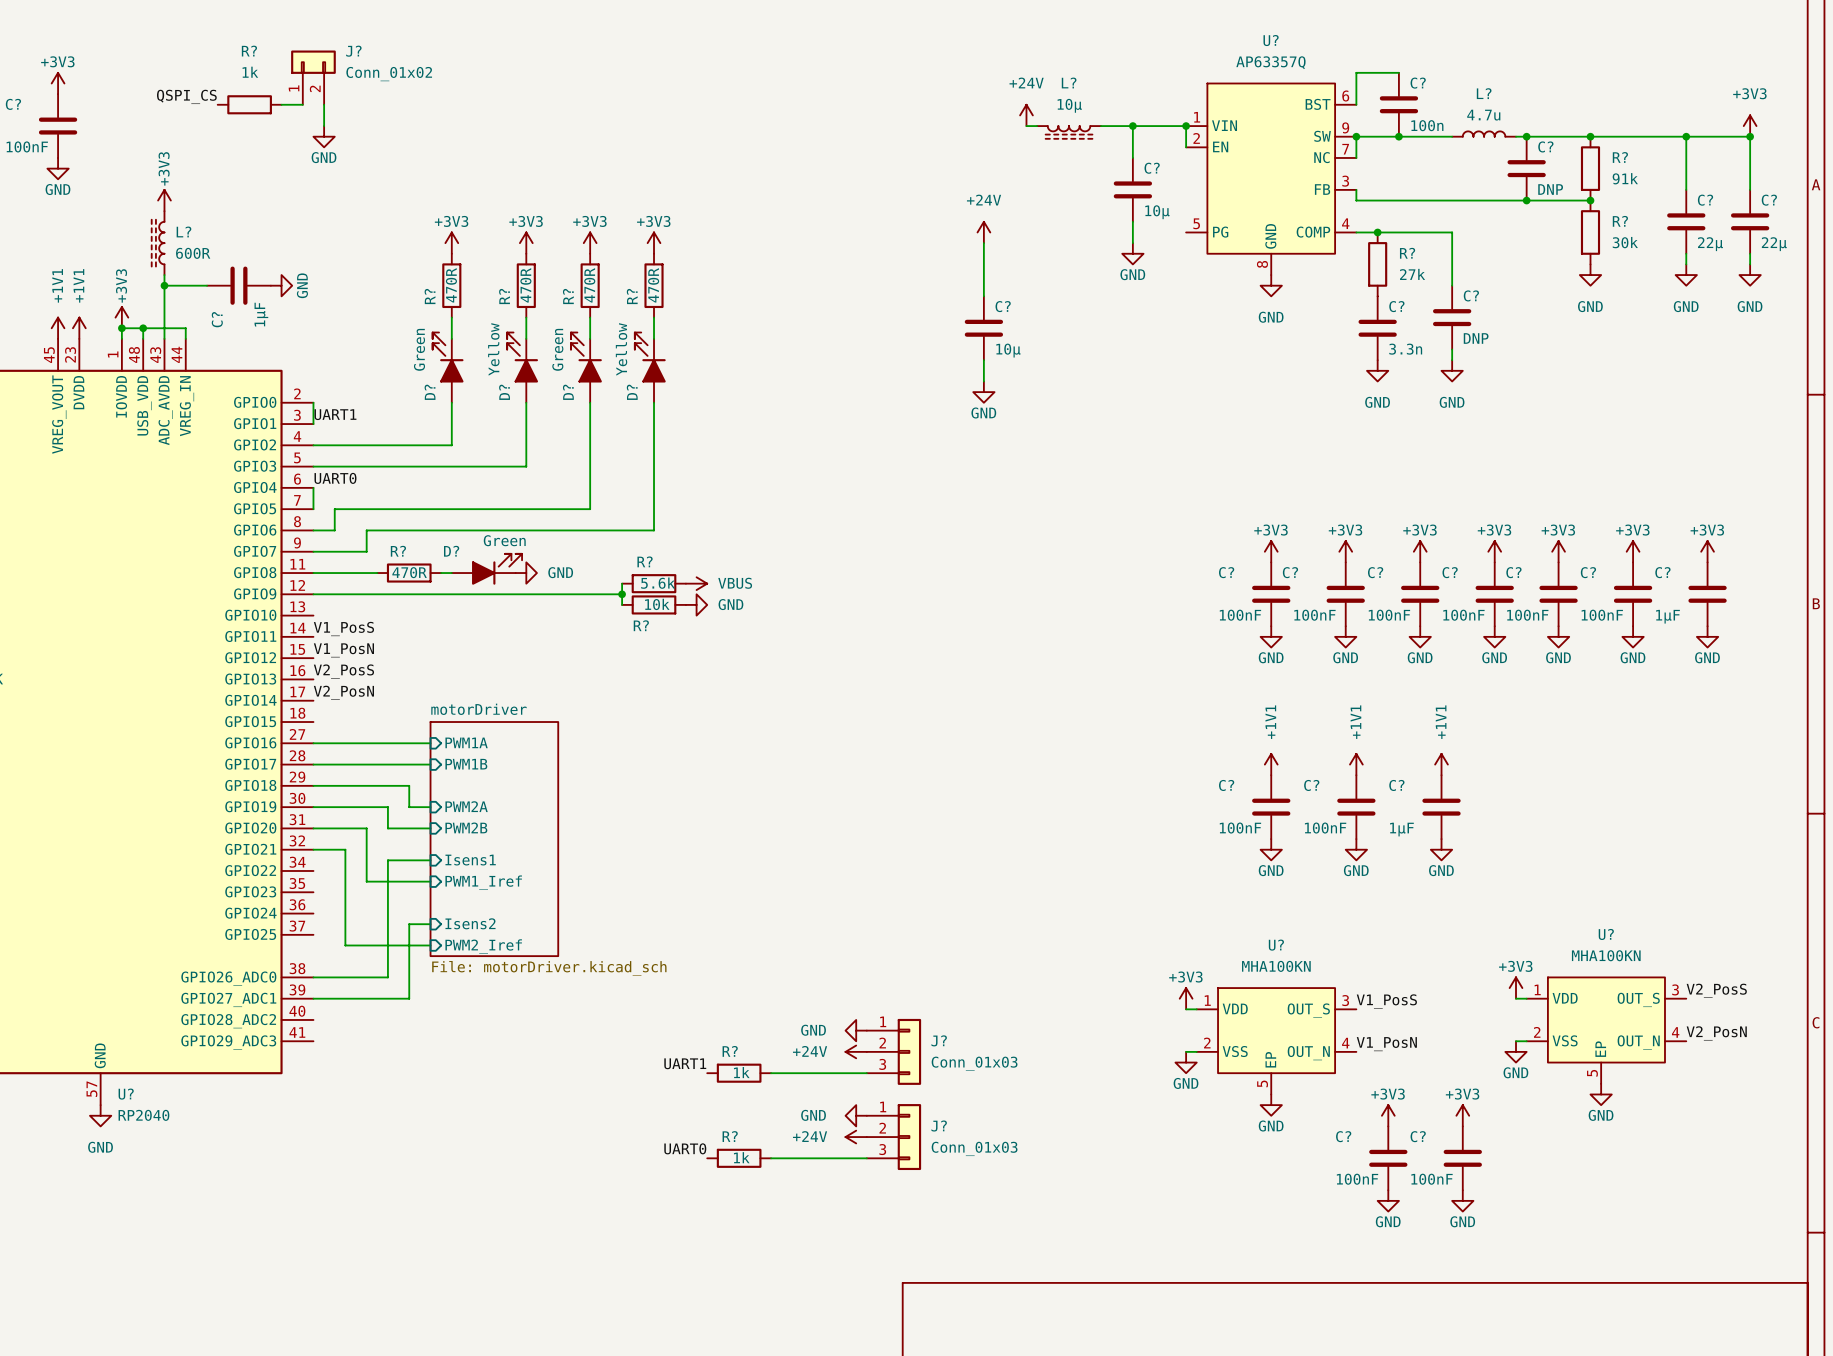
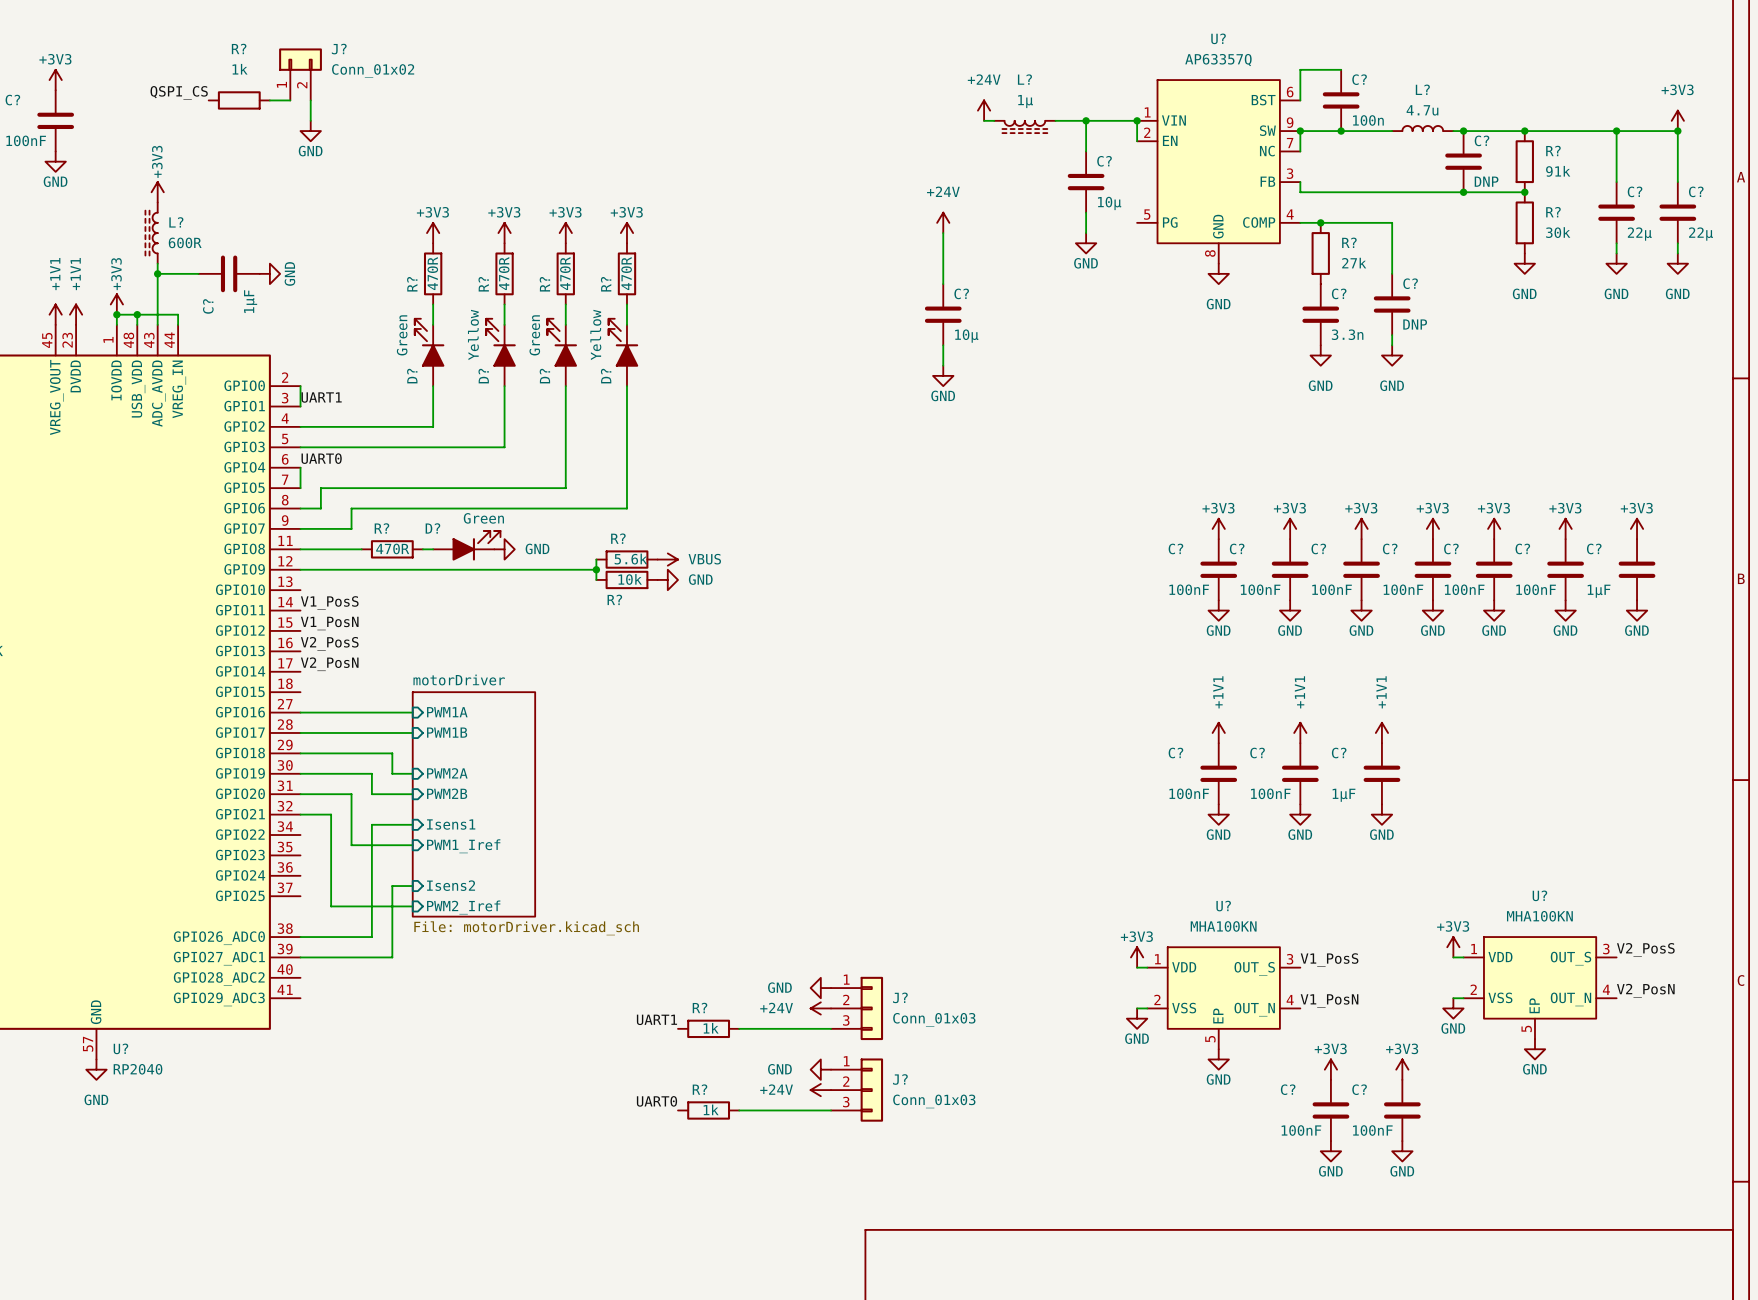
L? value: 10µ (1069, 105) -> 1µ (1025, 101)

